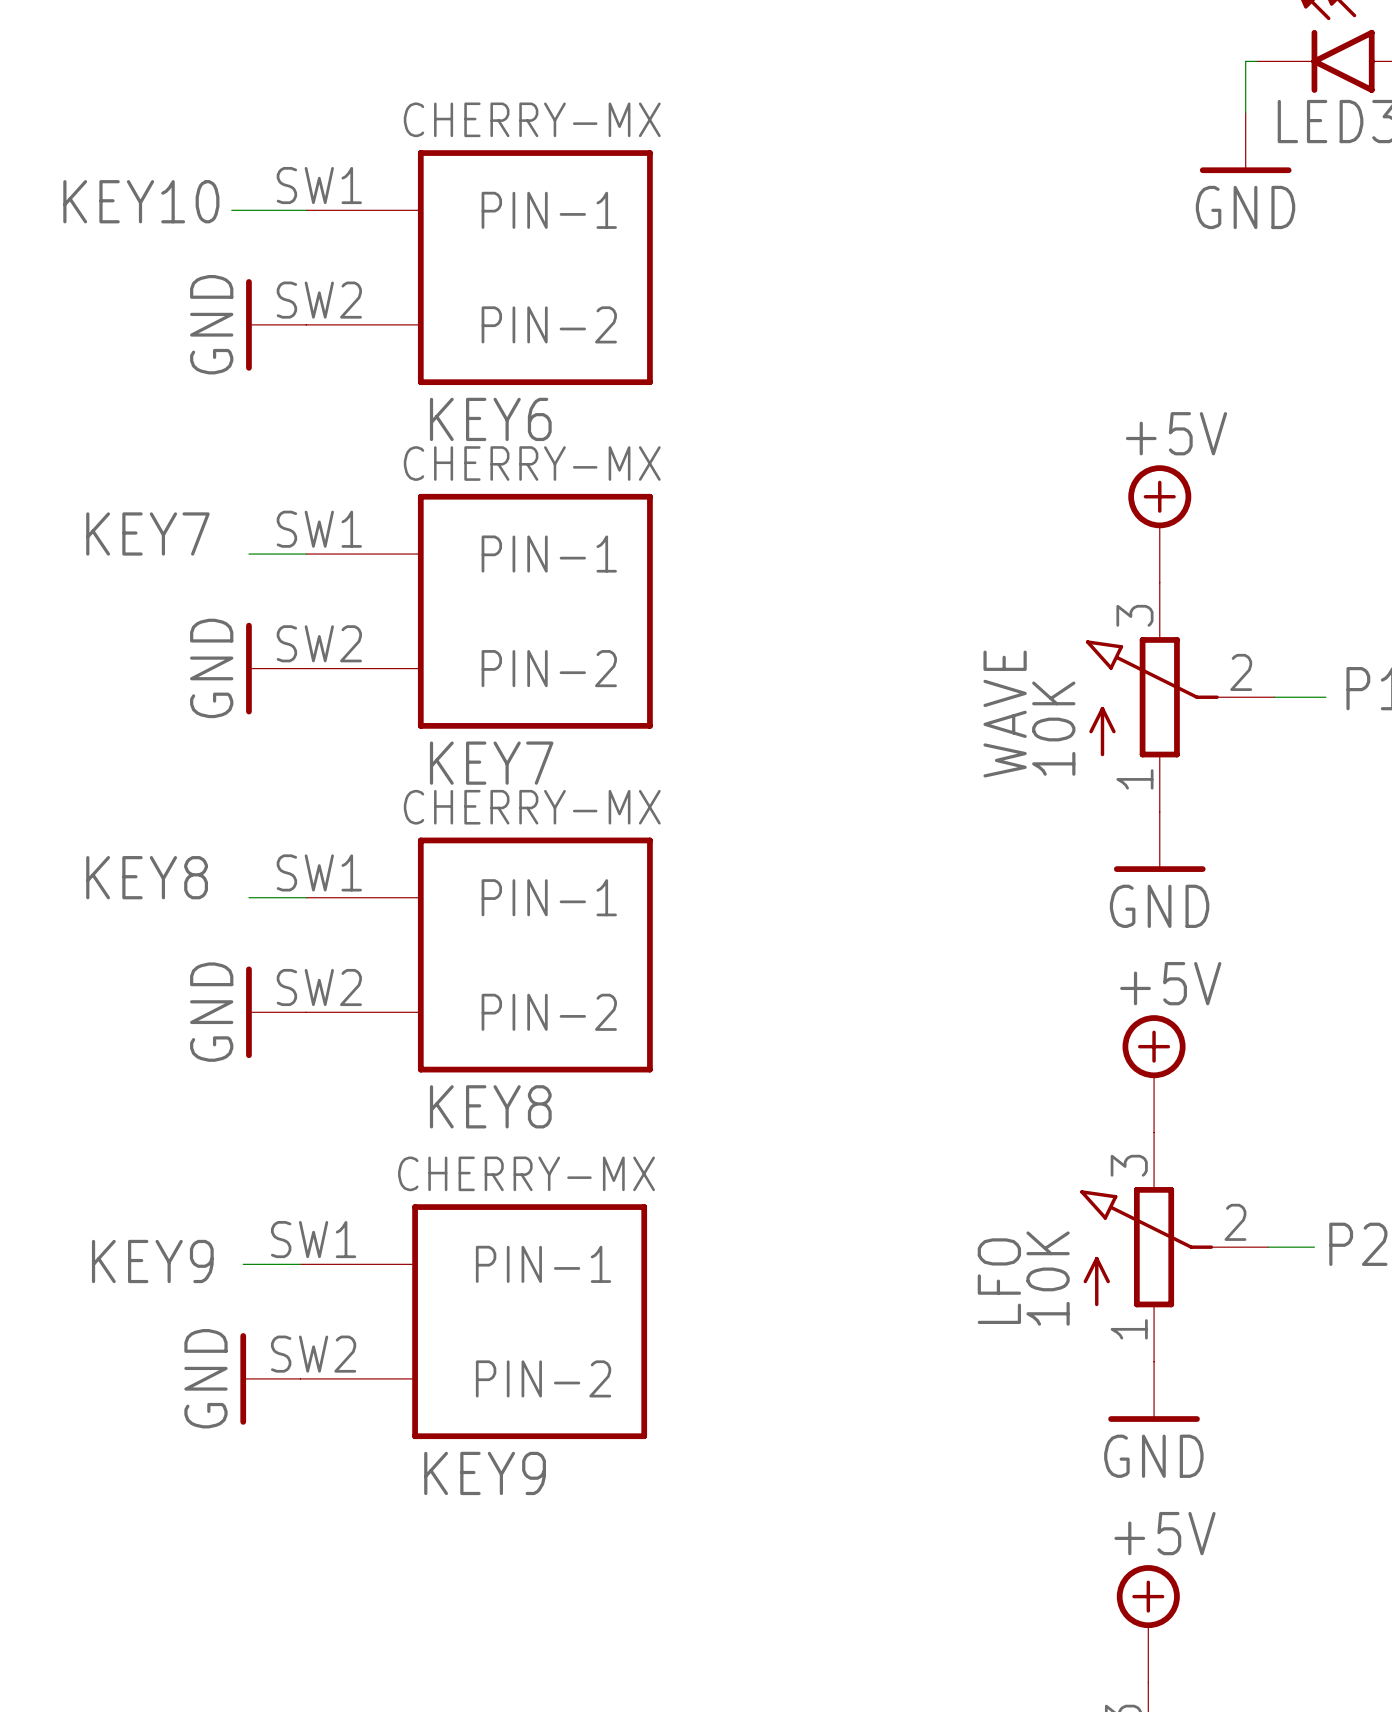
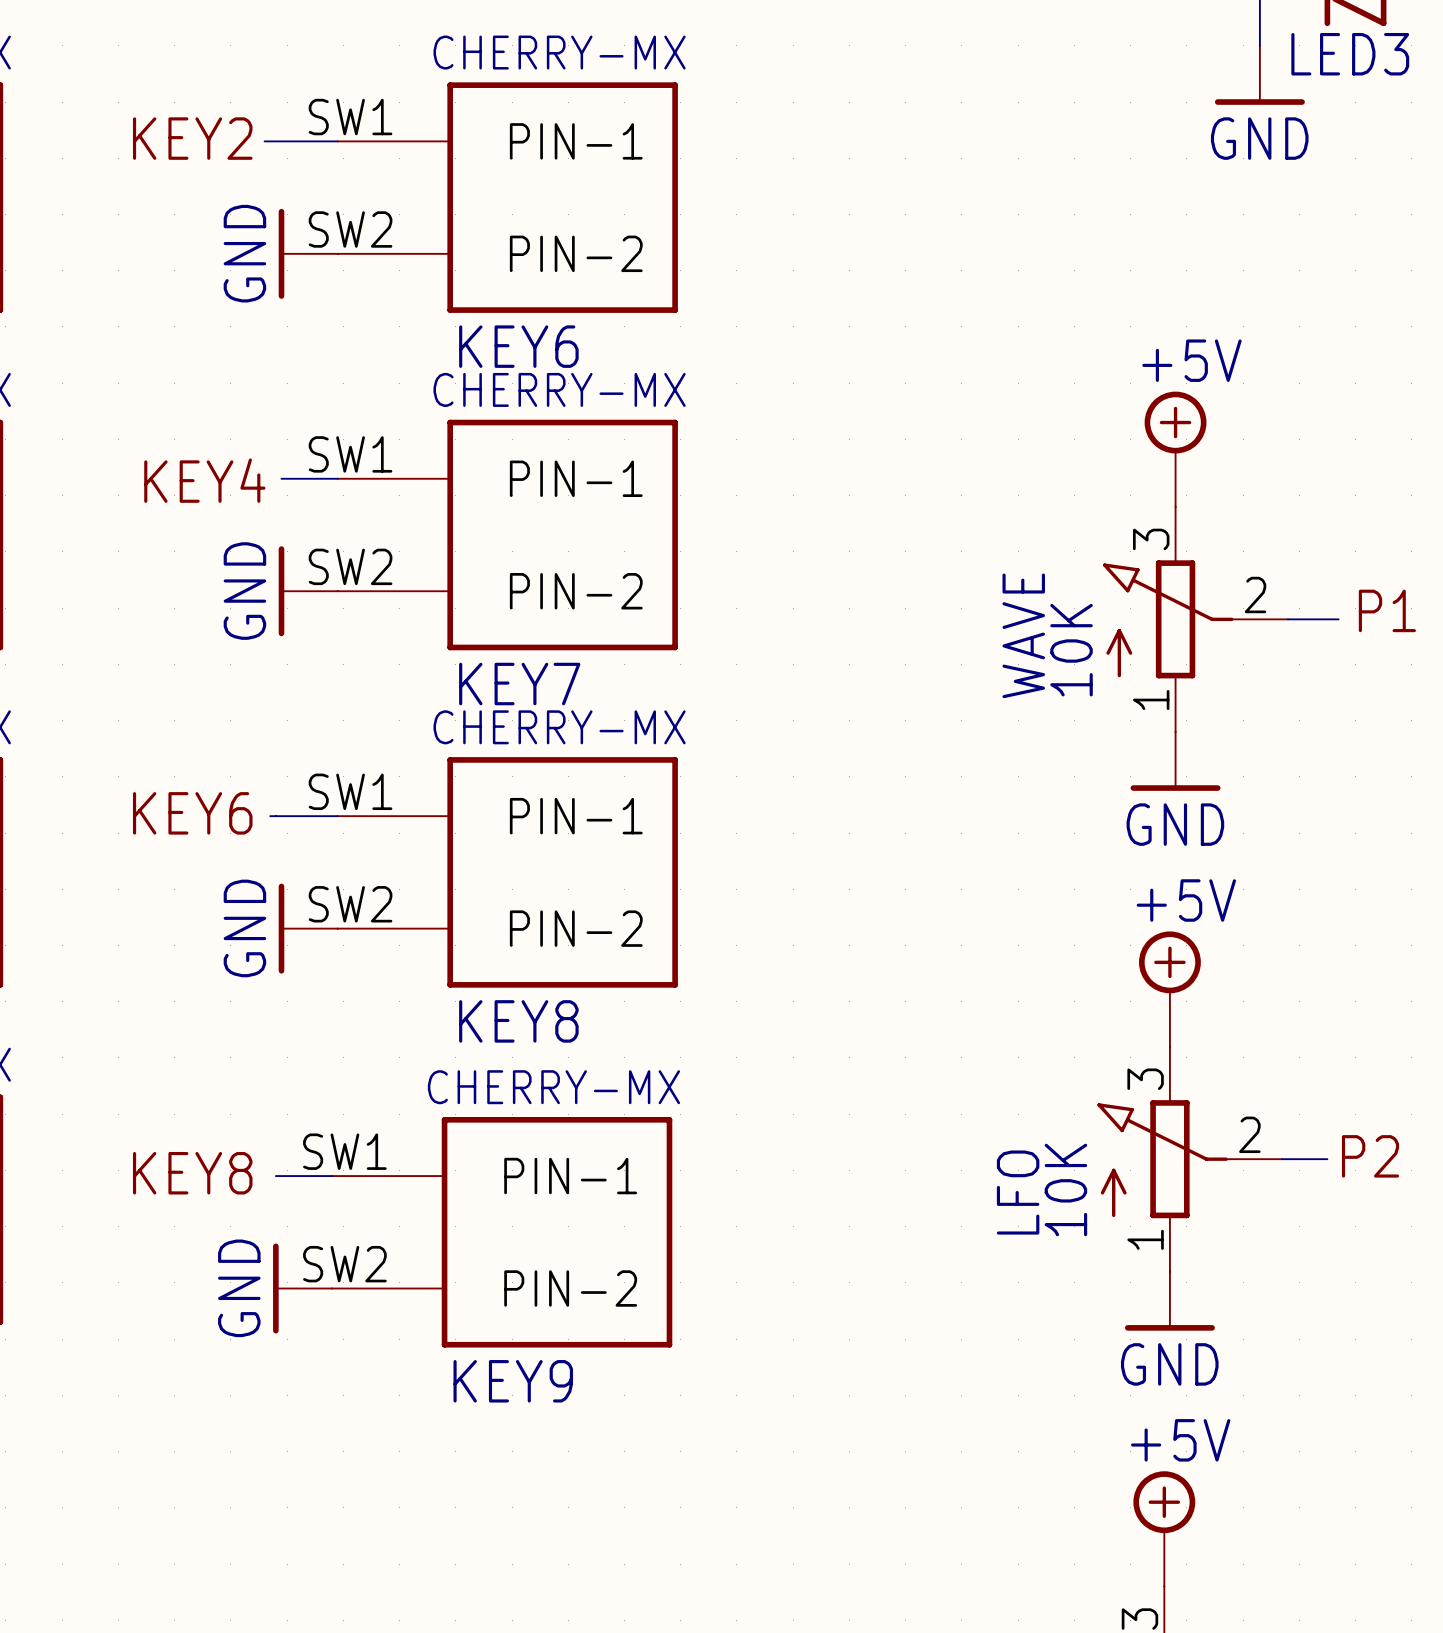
label: KEY10 (141, 201) -> KEY2 (192, 138)
label: KEY7 (147, 533) -> KEY4 (204, 480)
label: KEY8 (147, 877) -> KEY6 (192, 813)
wire: none -> (270, 816) (281, 816)
label: KEY9 (152, 1261) -> KEY8 (192, 1173)

